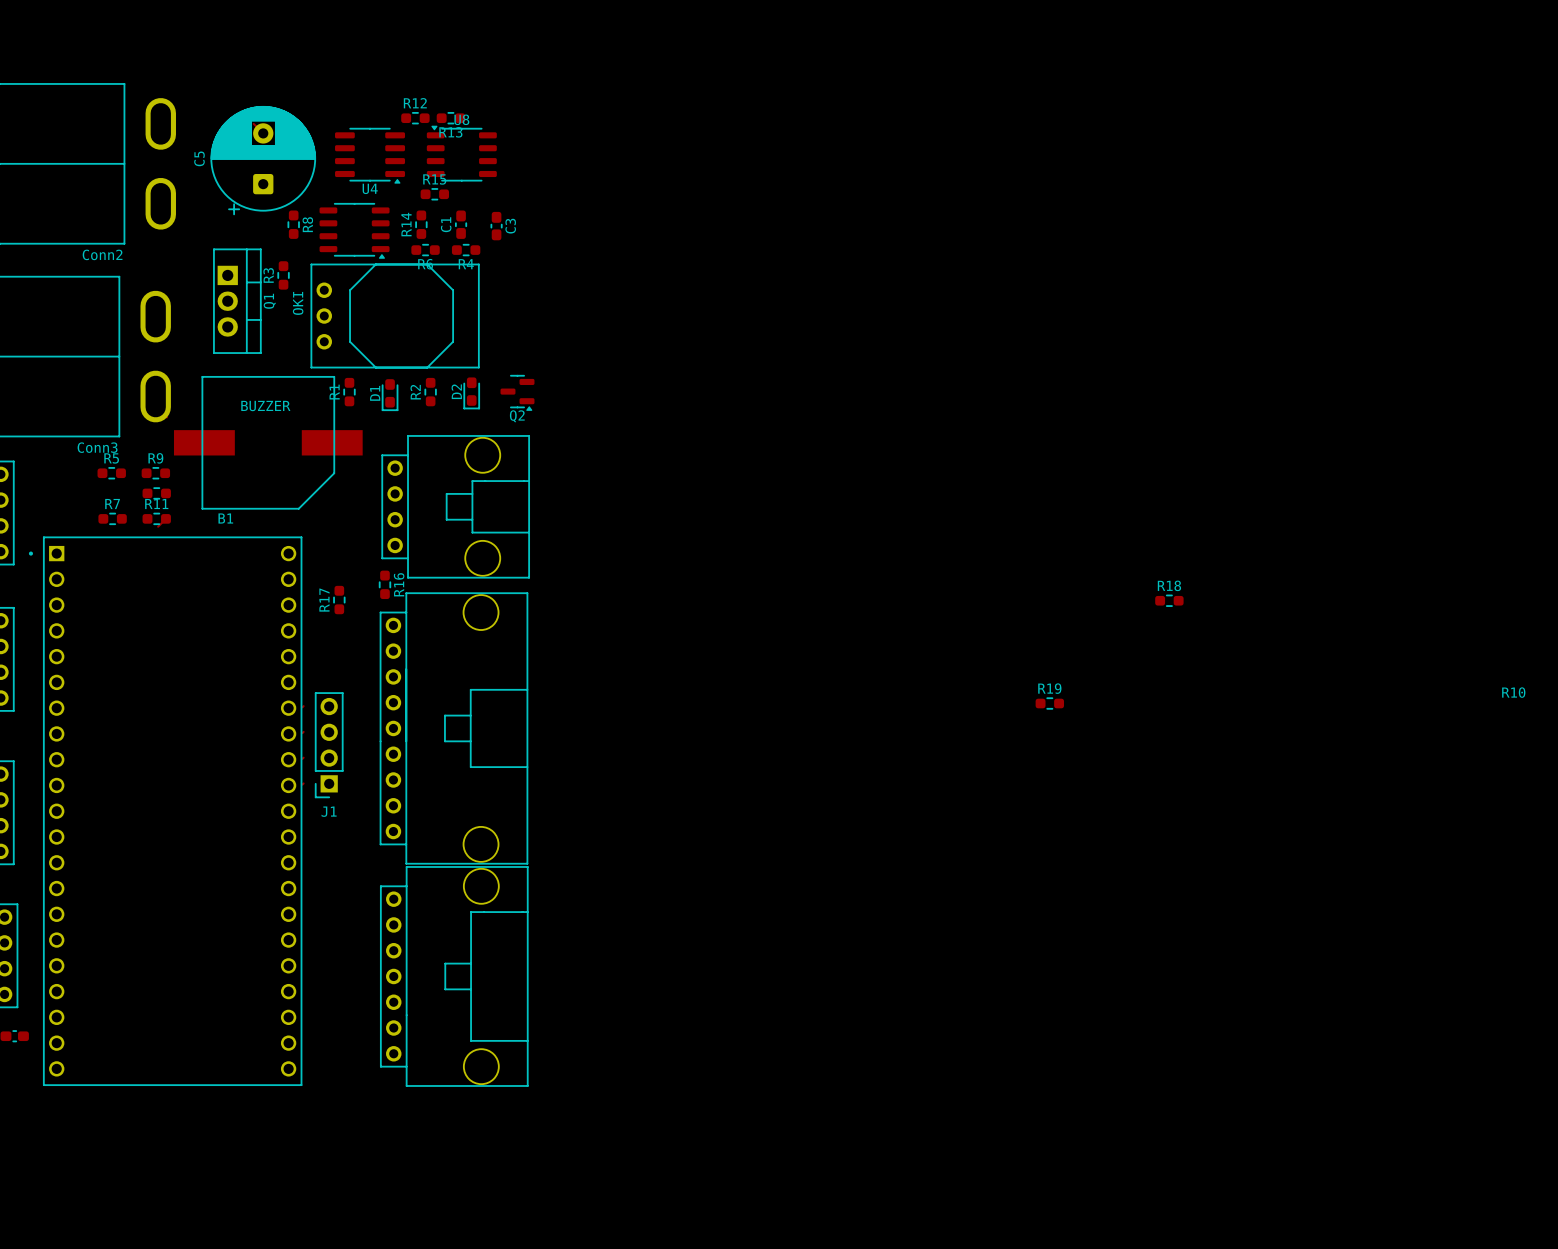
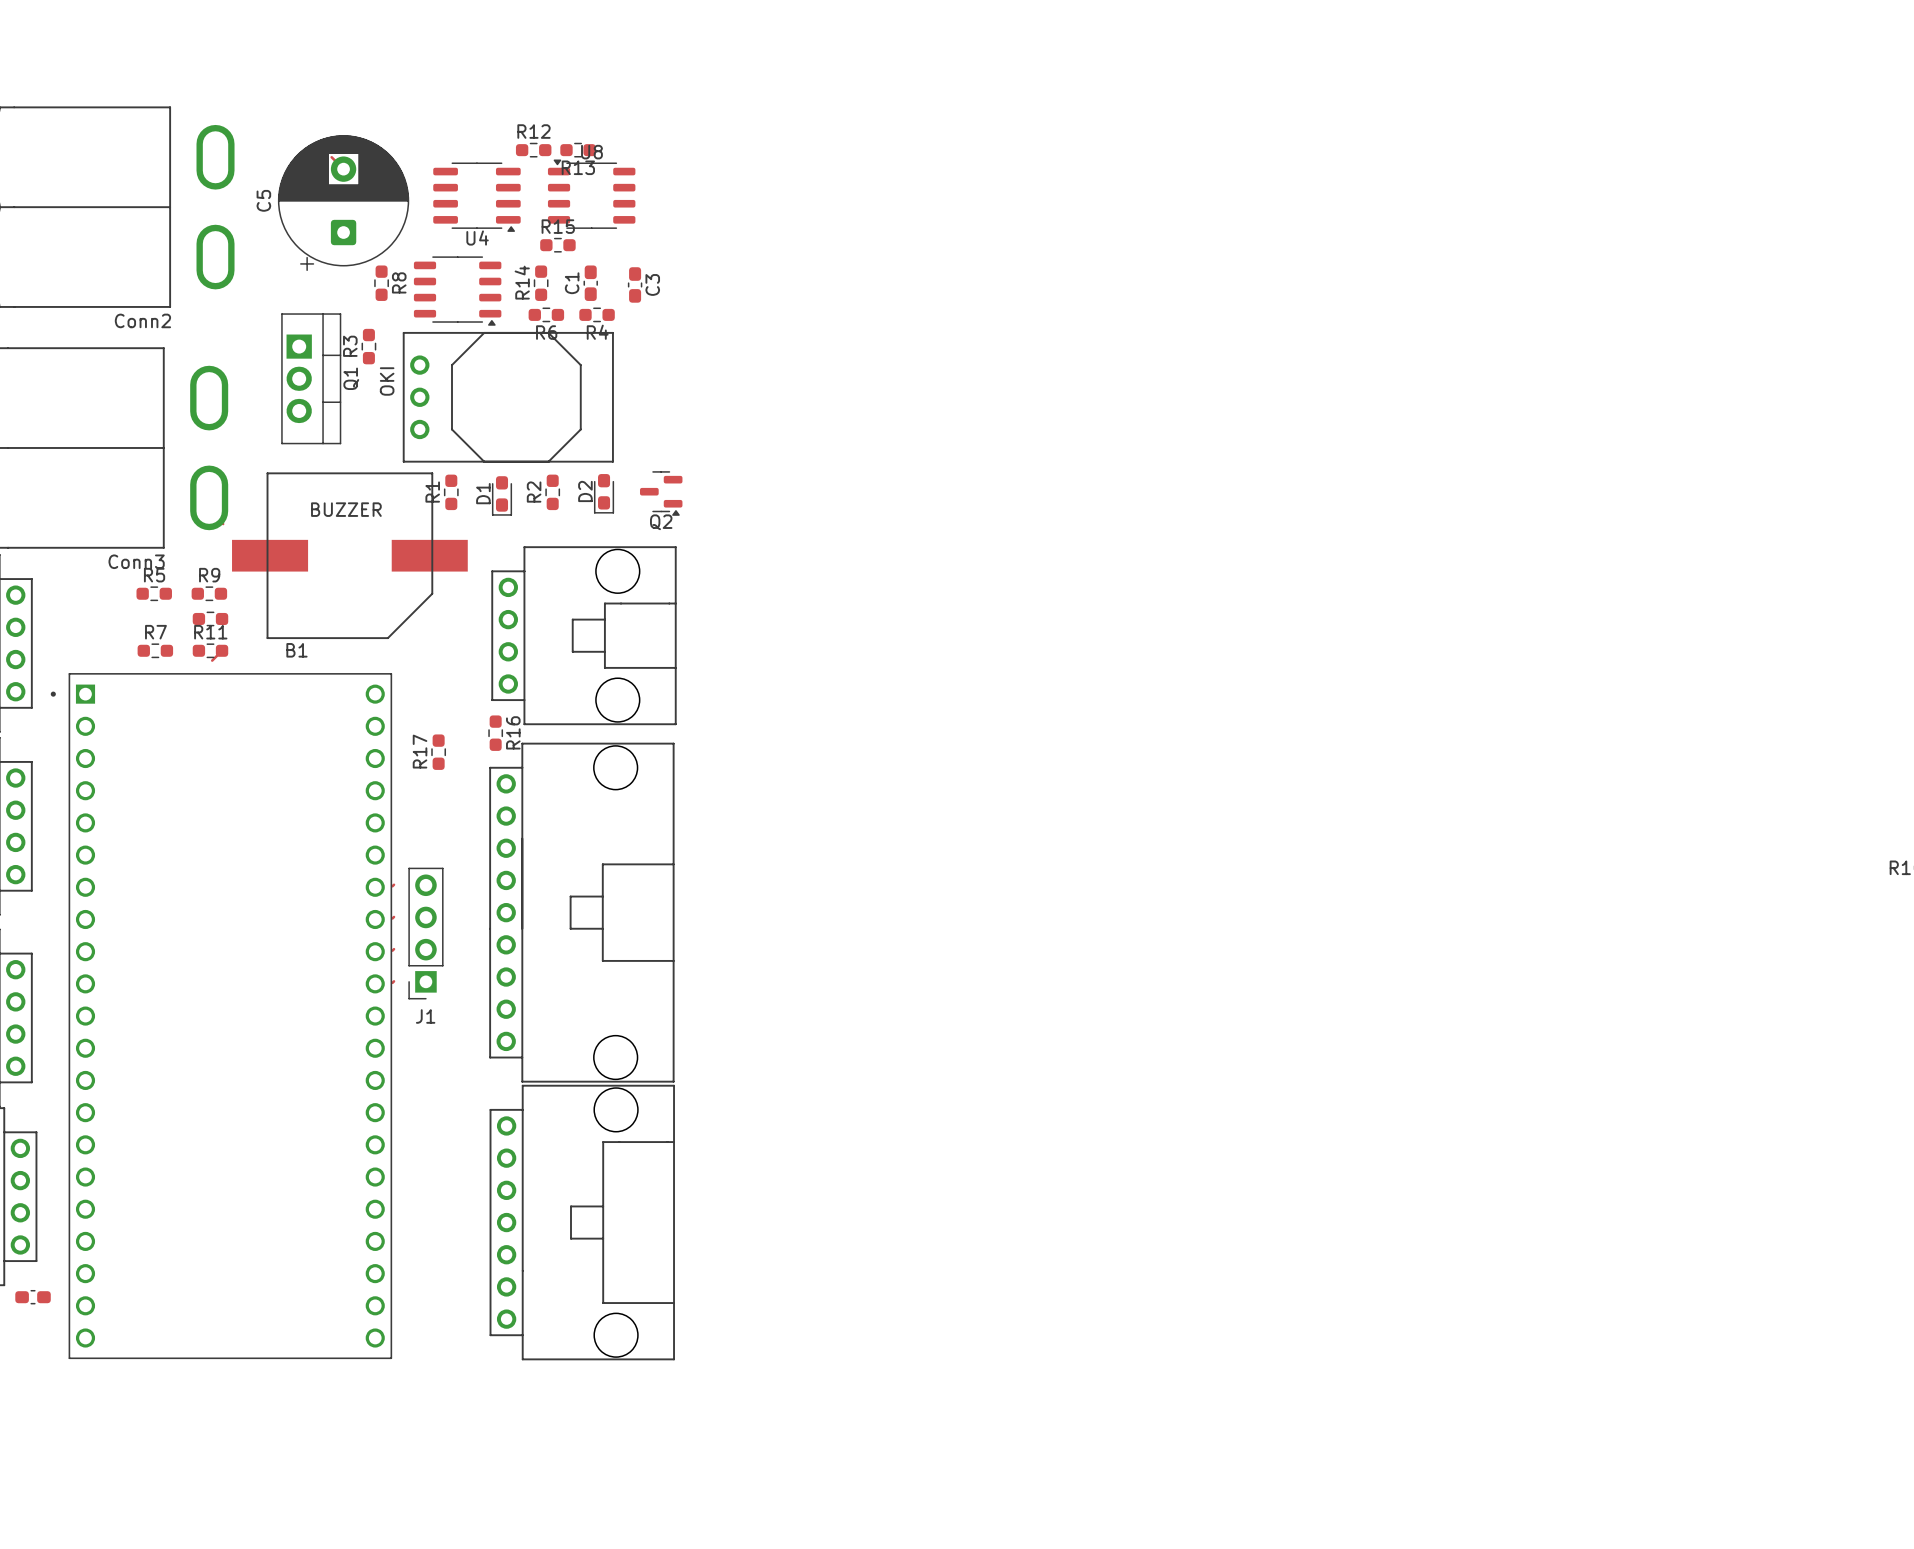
R18: (1169, 600) -> none
R19: (1049, 703) -> none

